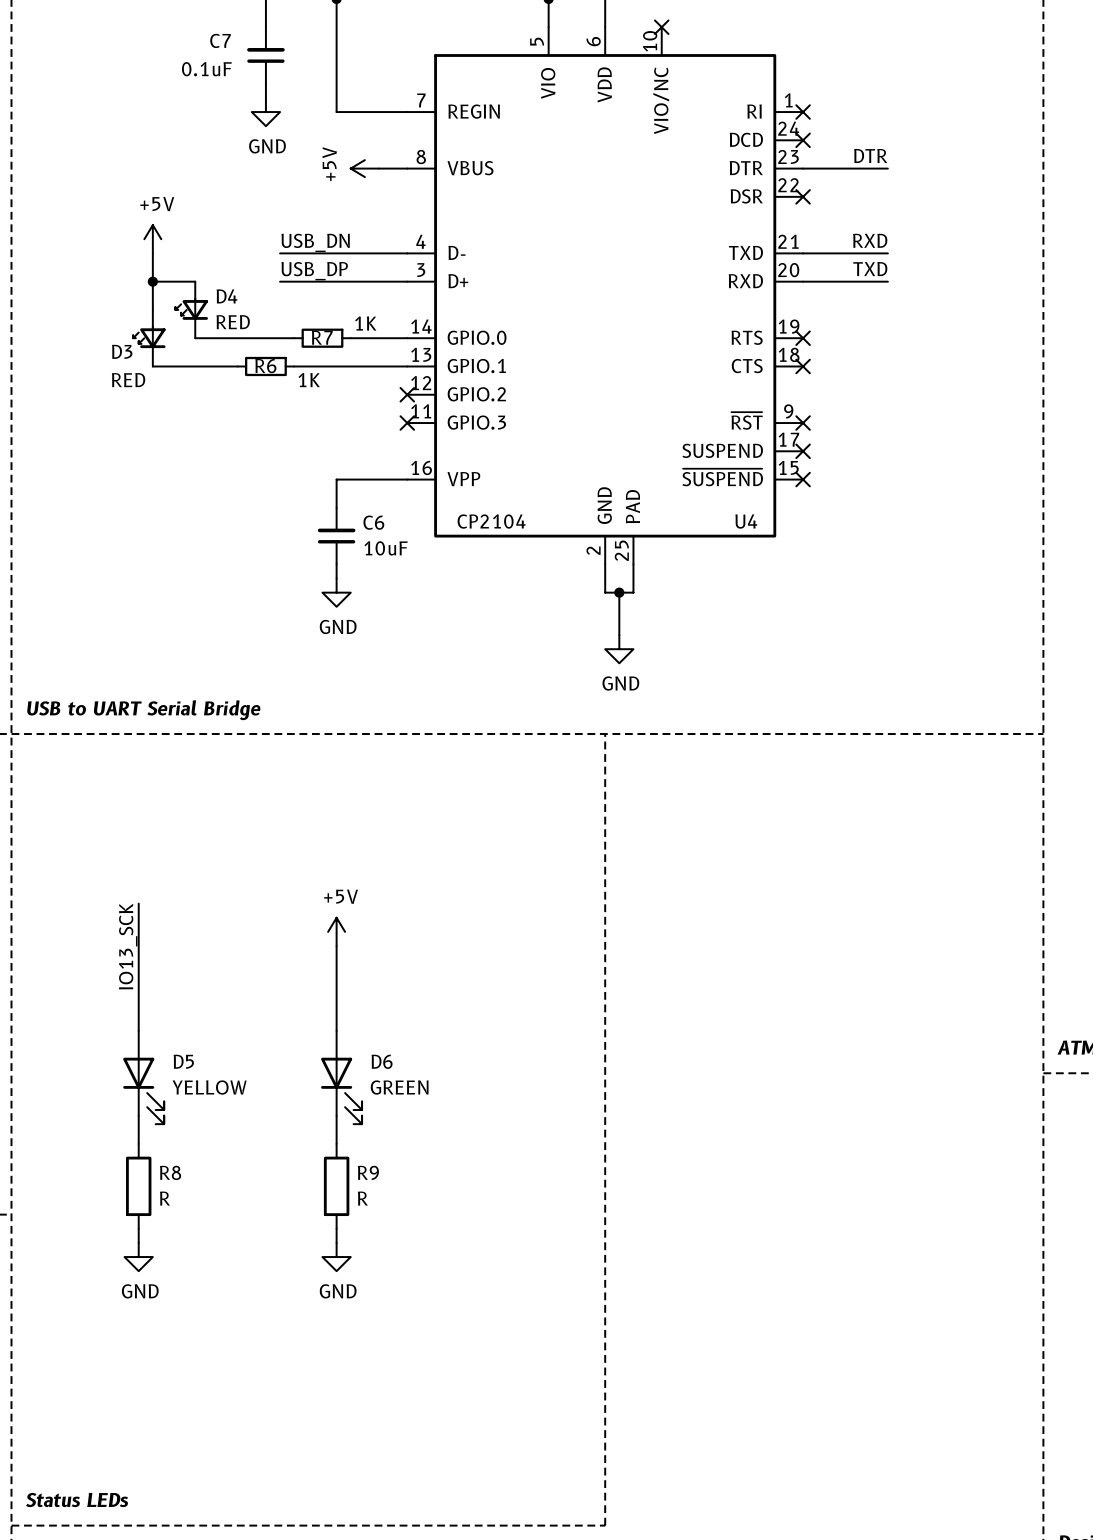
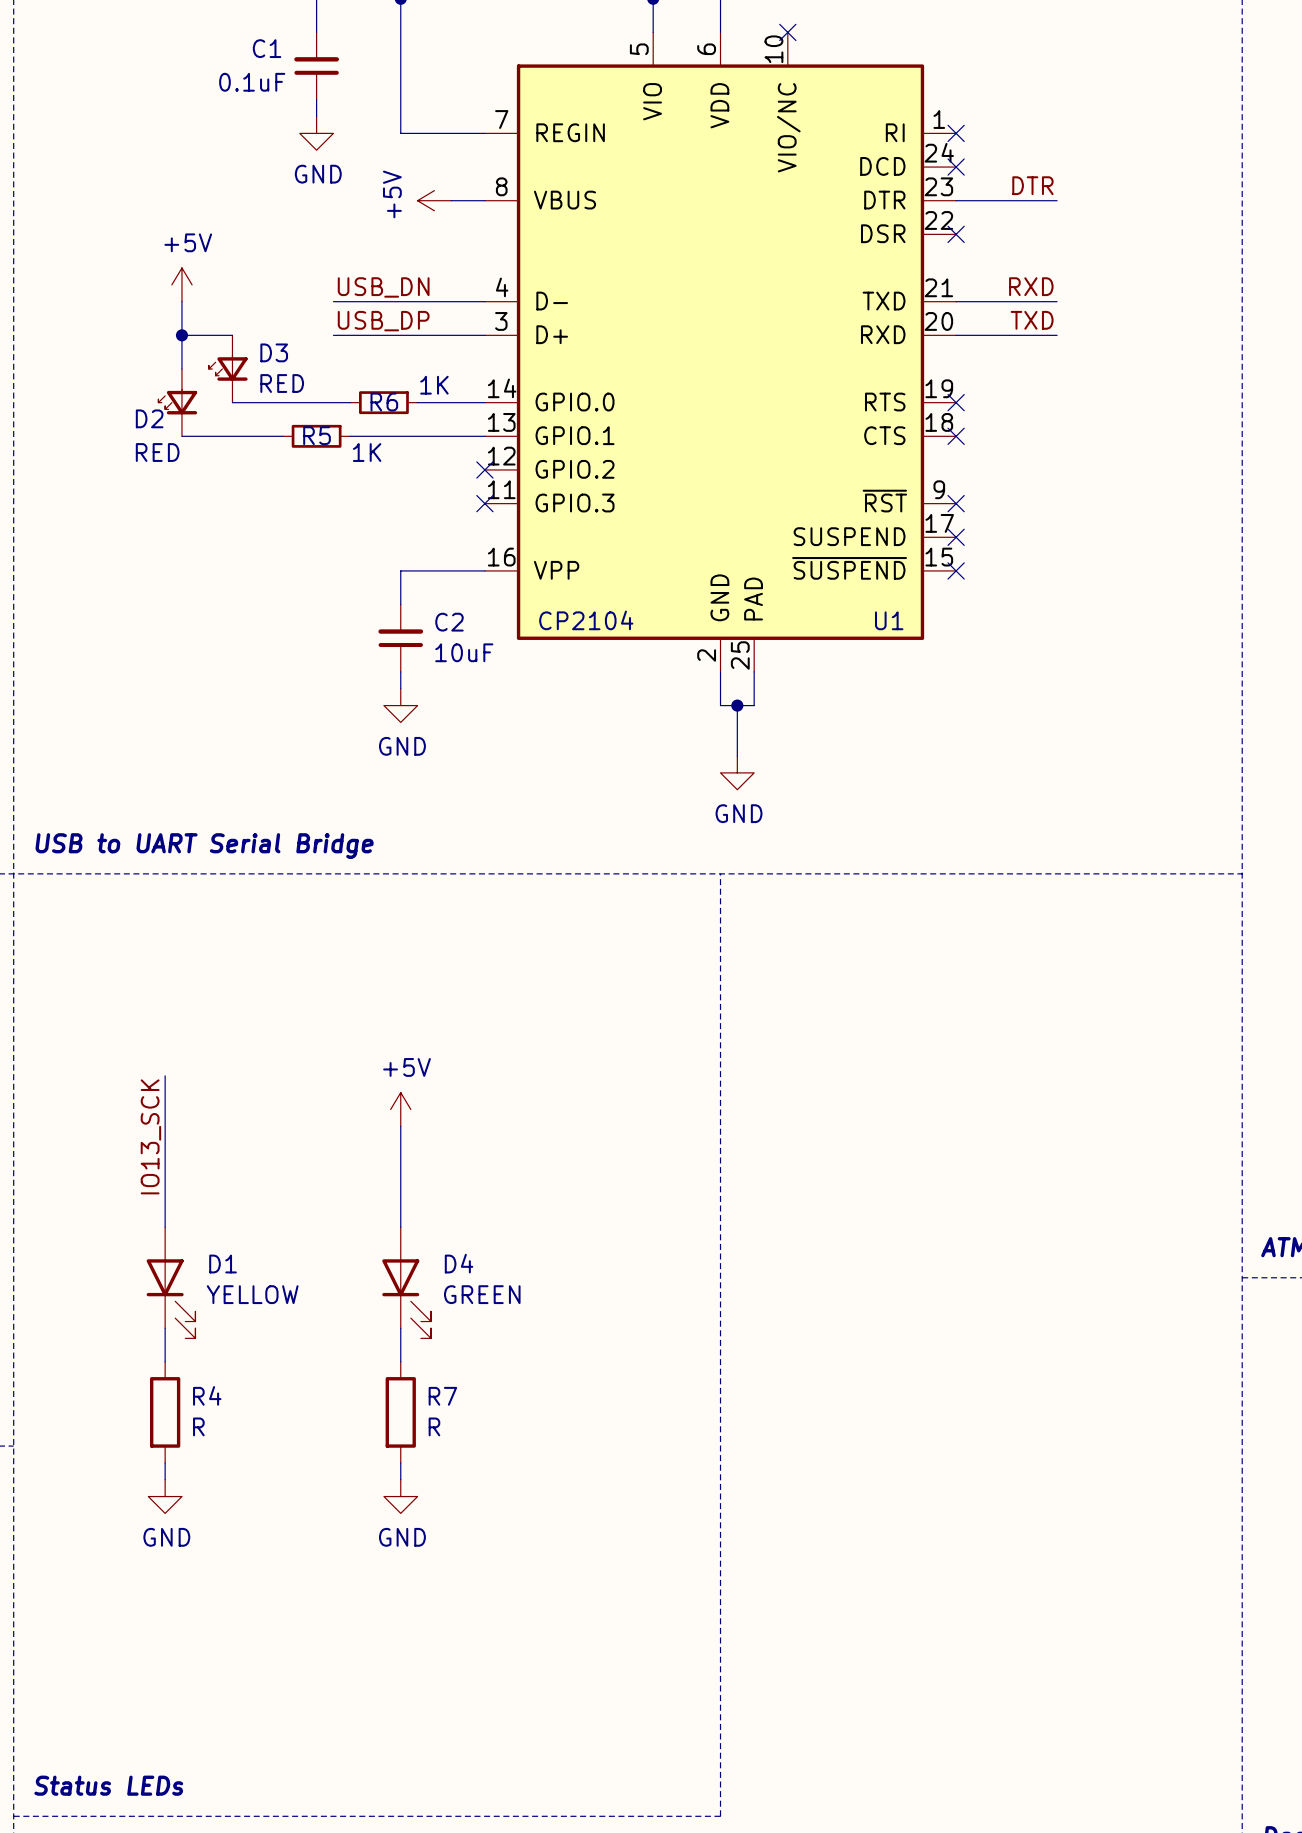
C7 name: C7 (220, 40) -> C1 (267, 48)
D4 name: D4 (227, 296) -> D3 (274, 352)
R7 name: R7 (322, 337) -> R6 (384, 402)
D3 name: D3 (122, 351) -> D2 (149, 418)
R6 name: R6 (265, 366) -> R5 (317, 435)
U4 name: U4 (746, 521) -> U1 (889, 620)
C6 name: C6 (373, 522) -> C2 (449, 622)
D5 name: D5 (183, 1061) -> D1 (223, 1264)
D6 name: D6 (382, 1061) -> D4 (459, 1263)
R8 name: R8 (170, 1172) -> R4 (207, 1395)
R9 name: R9 (368, 1172) -> R7 (442, 1396)

